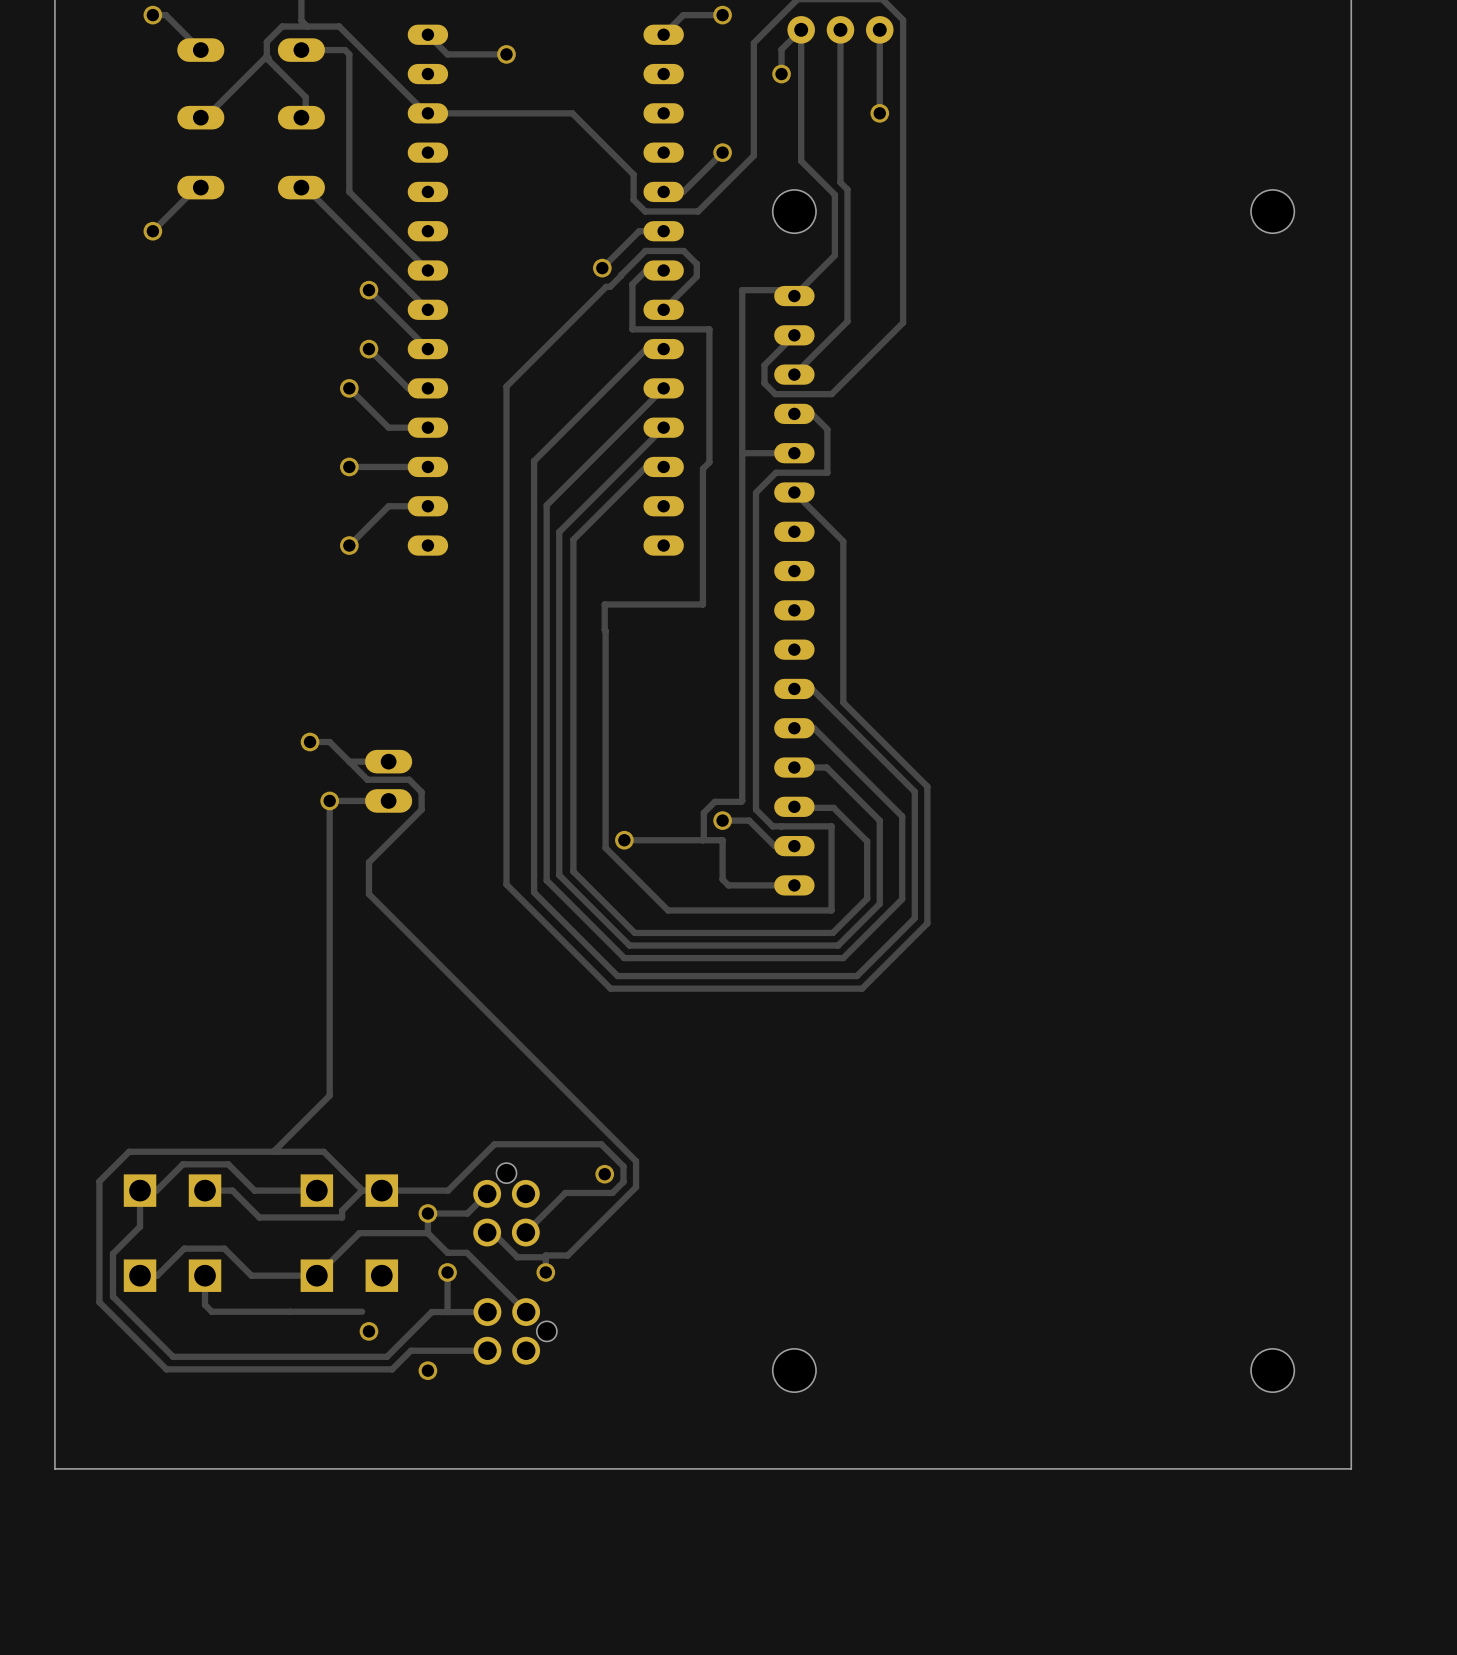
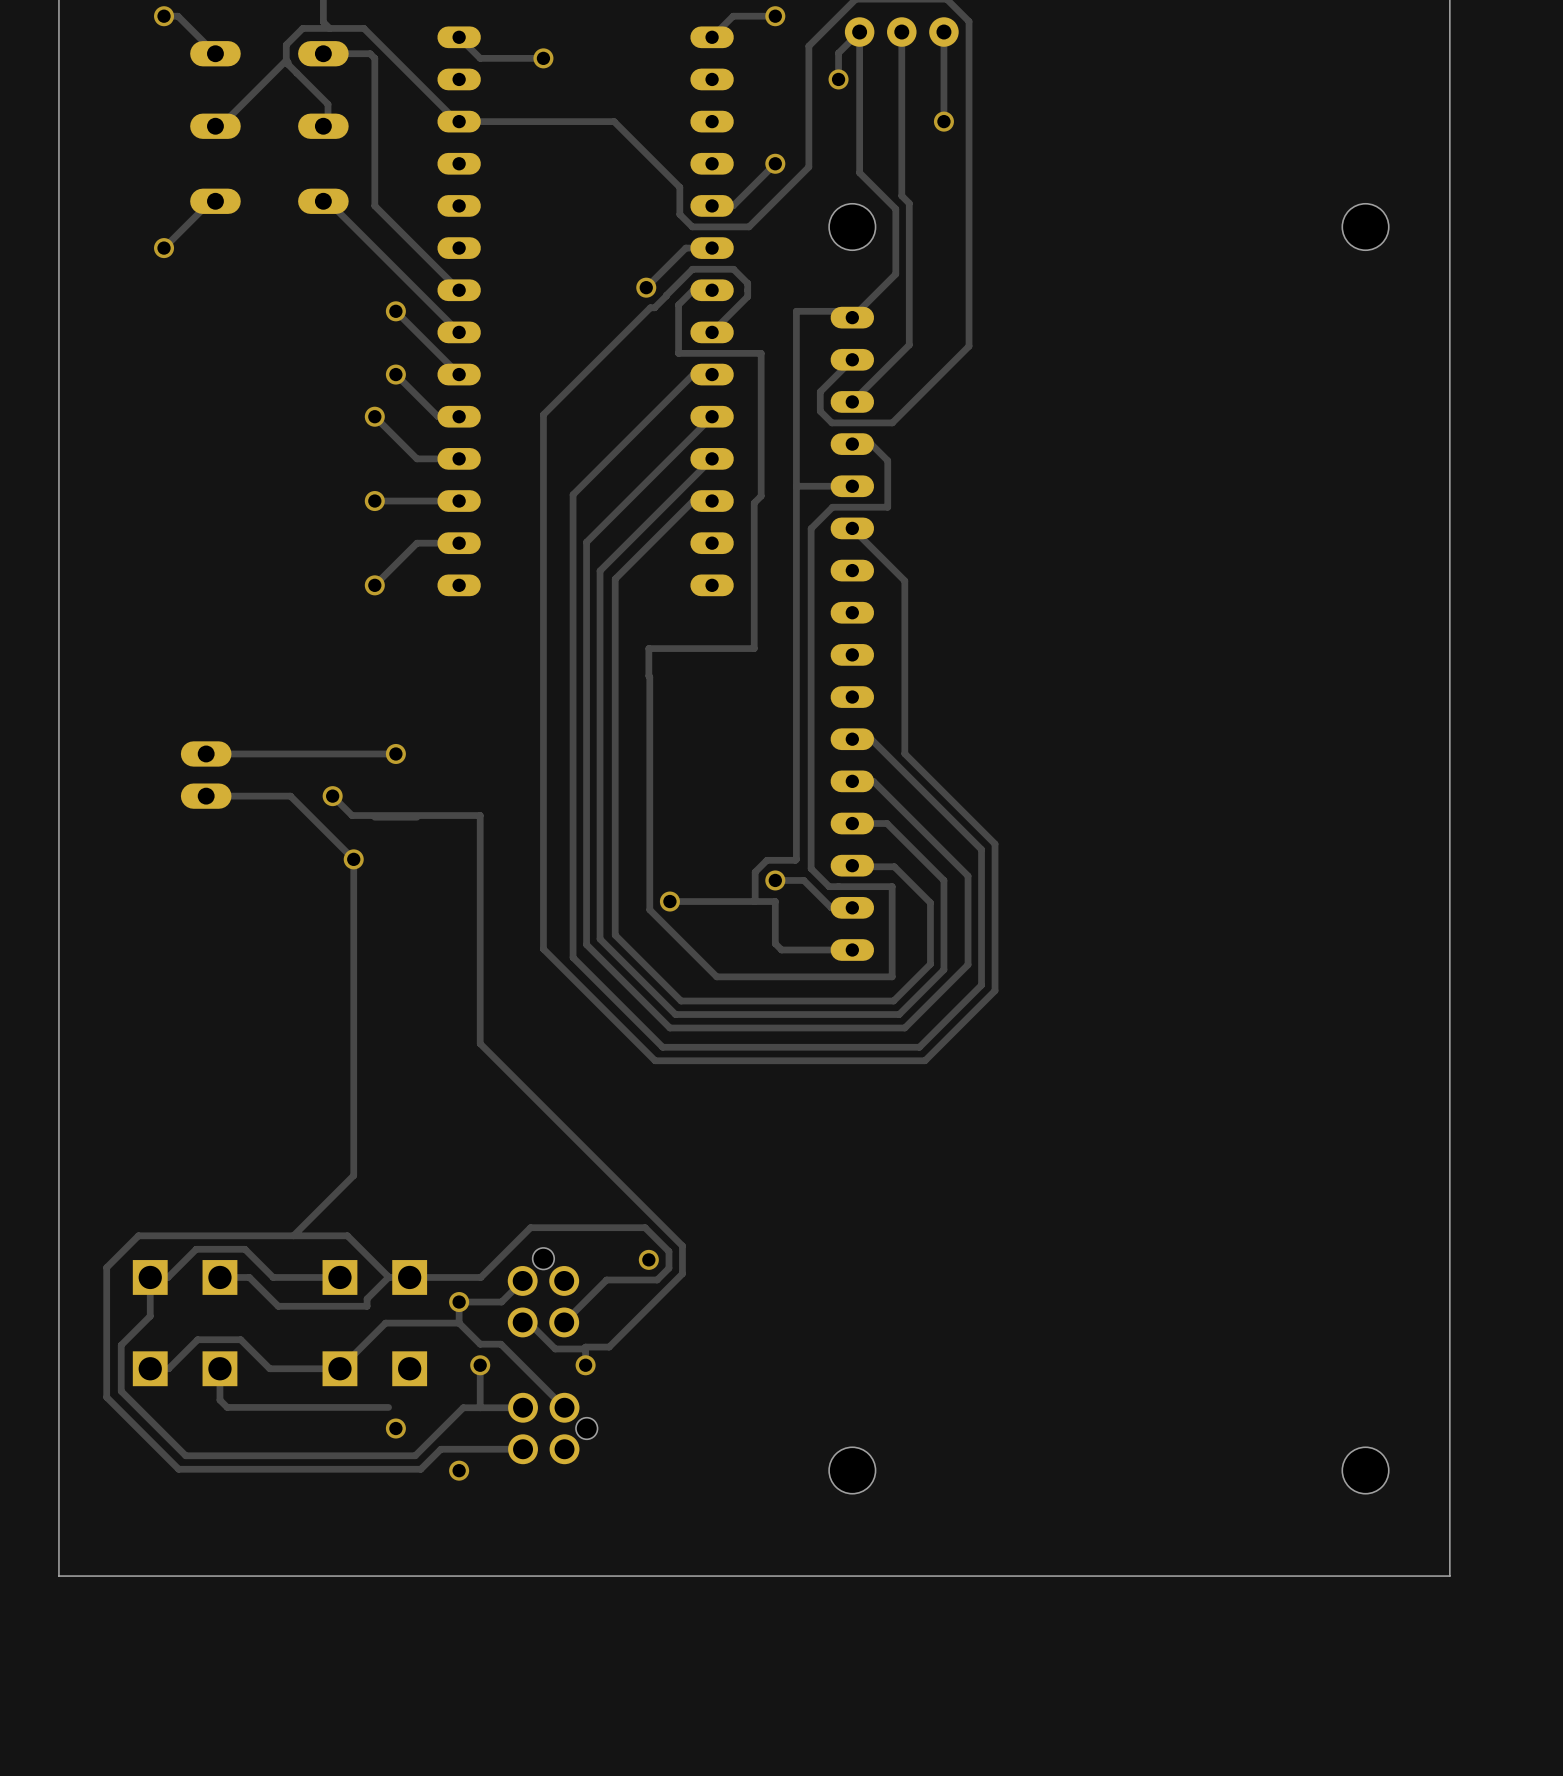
track: none -> (395, 753) (206, 753)
via: none -> (395, 753)
track: (310, 742) (329, 742) (367, 779) (409, 779) (421, 792) (421, 809) (368, 862) (368, 894) (447, 972) -> (332, 796) (352, 815) (480, 815) (480, 1043)
part position: (388, 781) -> (206, 775)
track: (388, 800) (329, 800) -> (206, 796) (290, 796) (353, 859)

